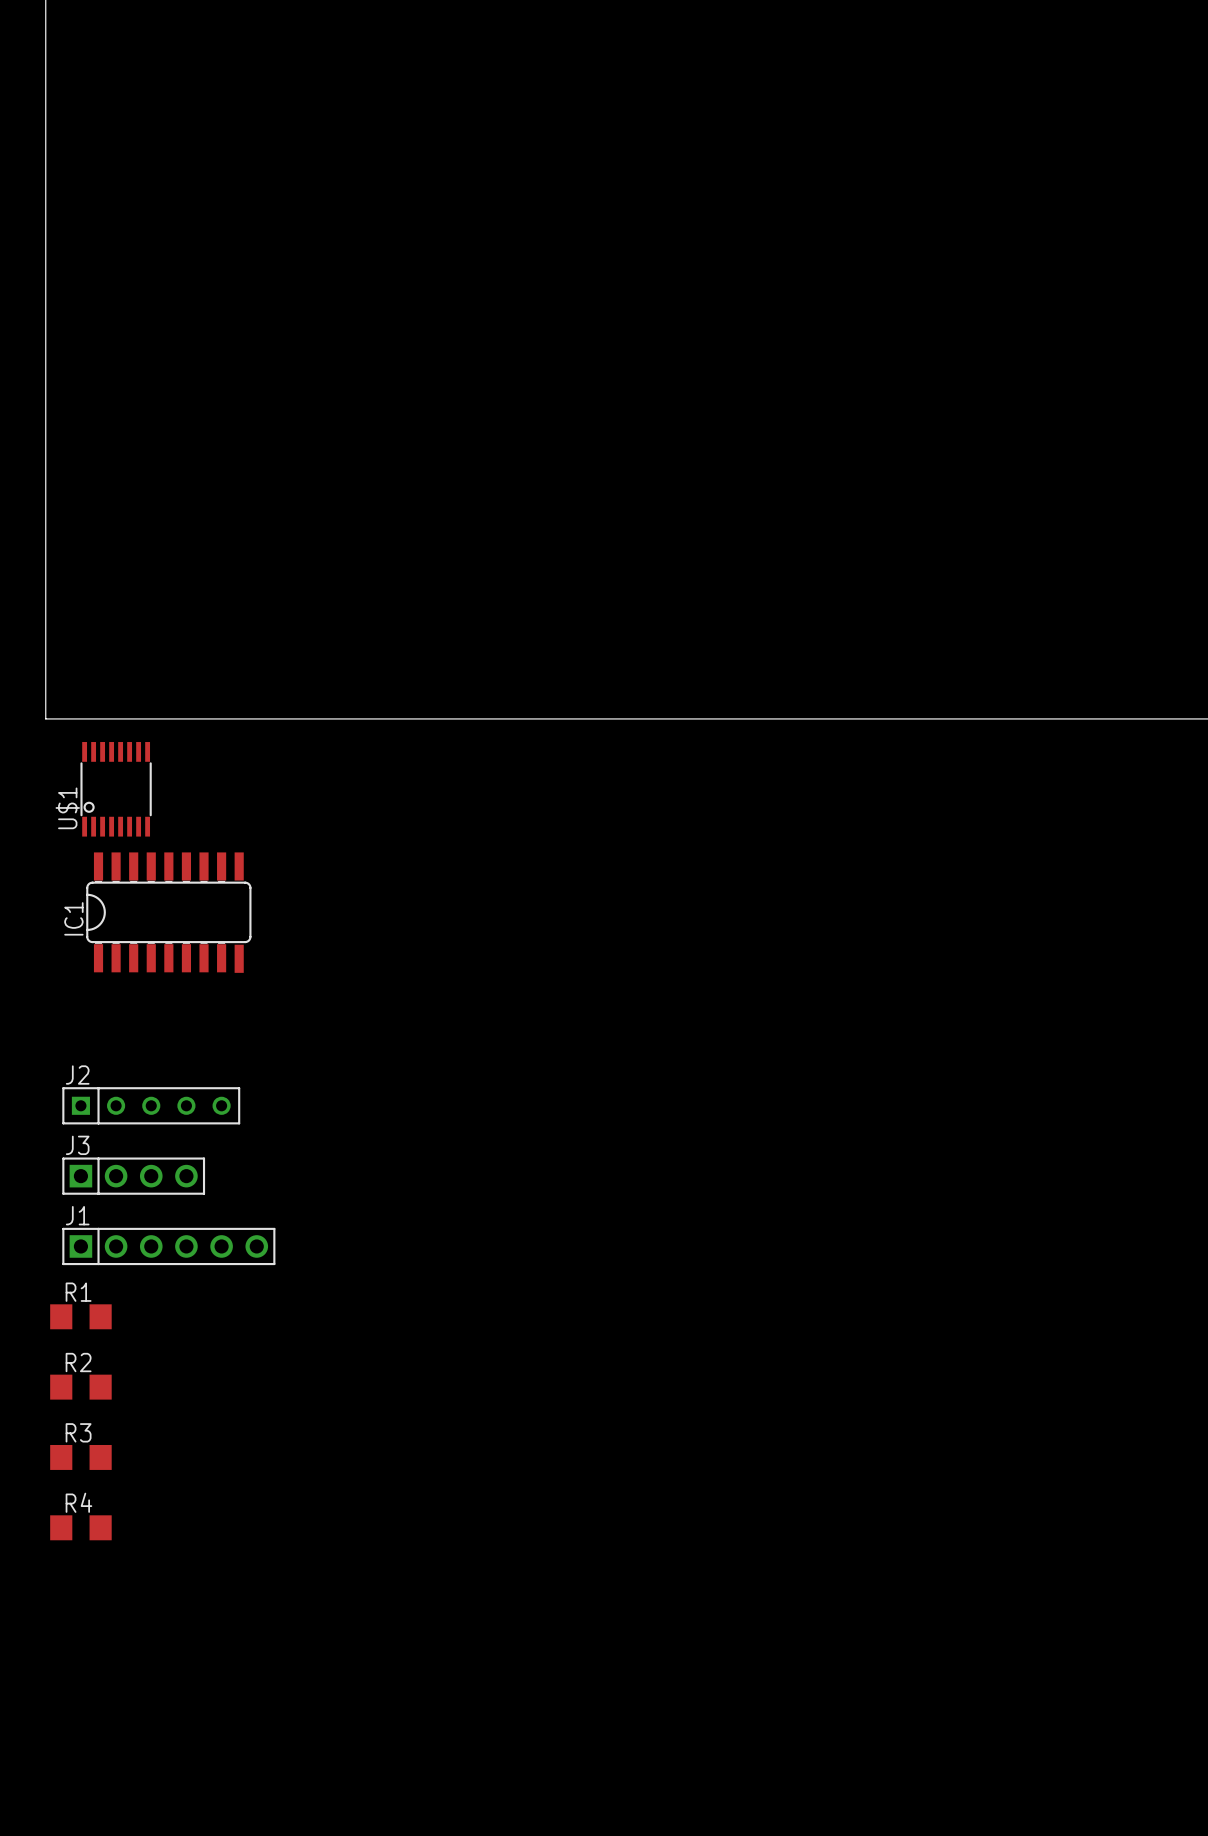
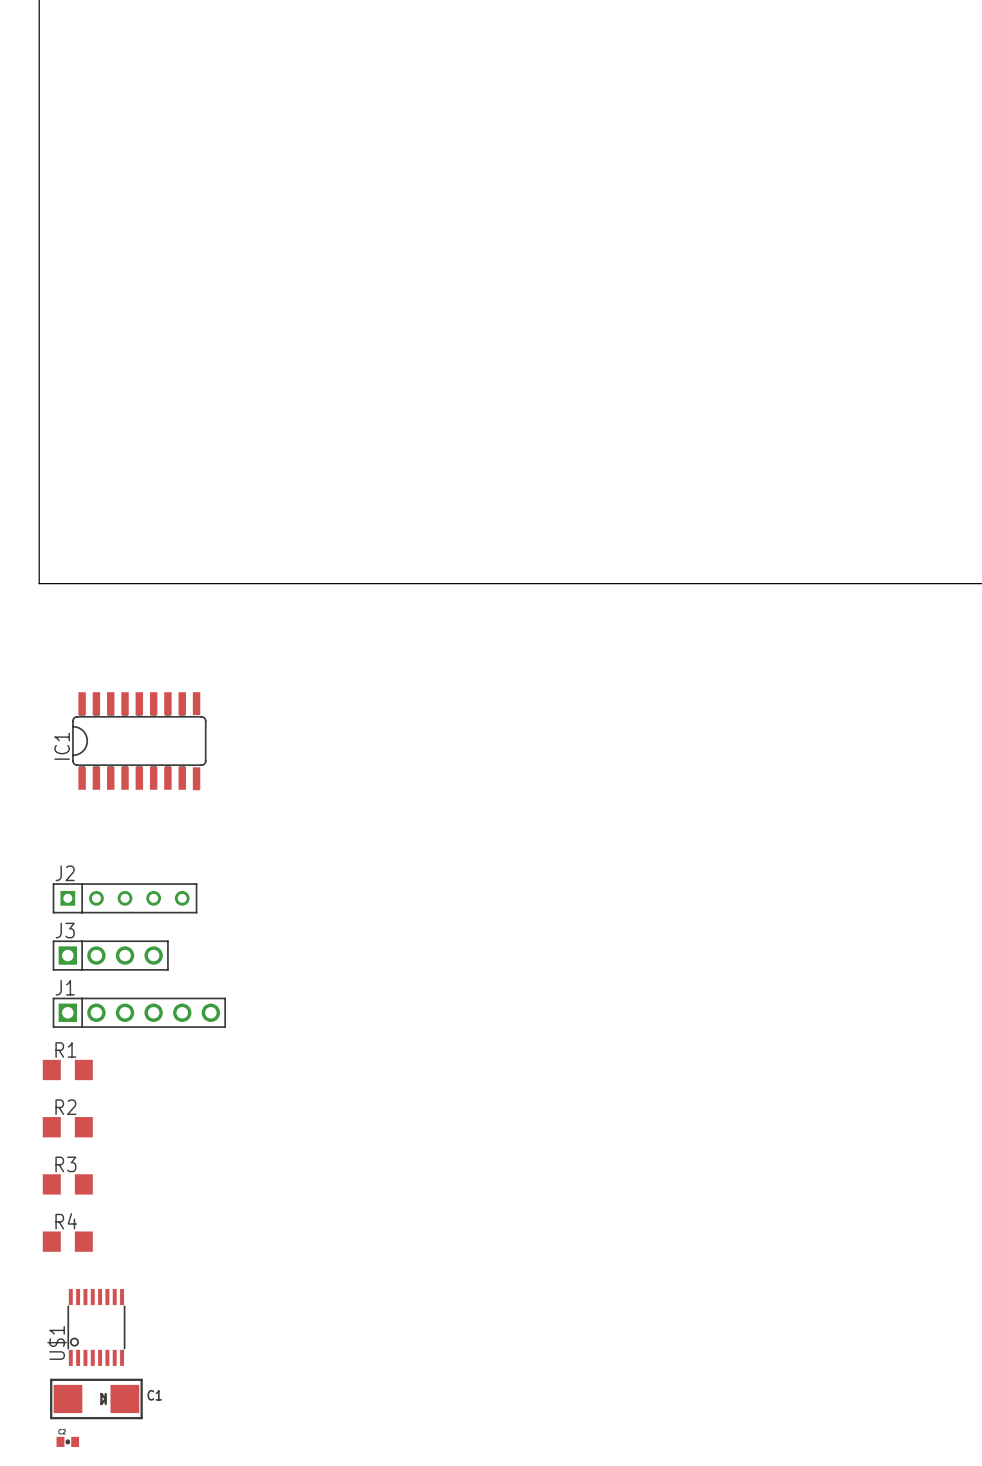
U$1 position: (116, 789) -> (96, 1327)
C1: none -> (96, 1398)
part: none -> (67, 1441)

